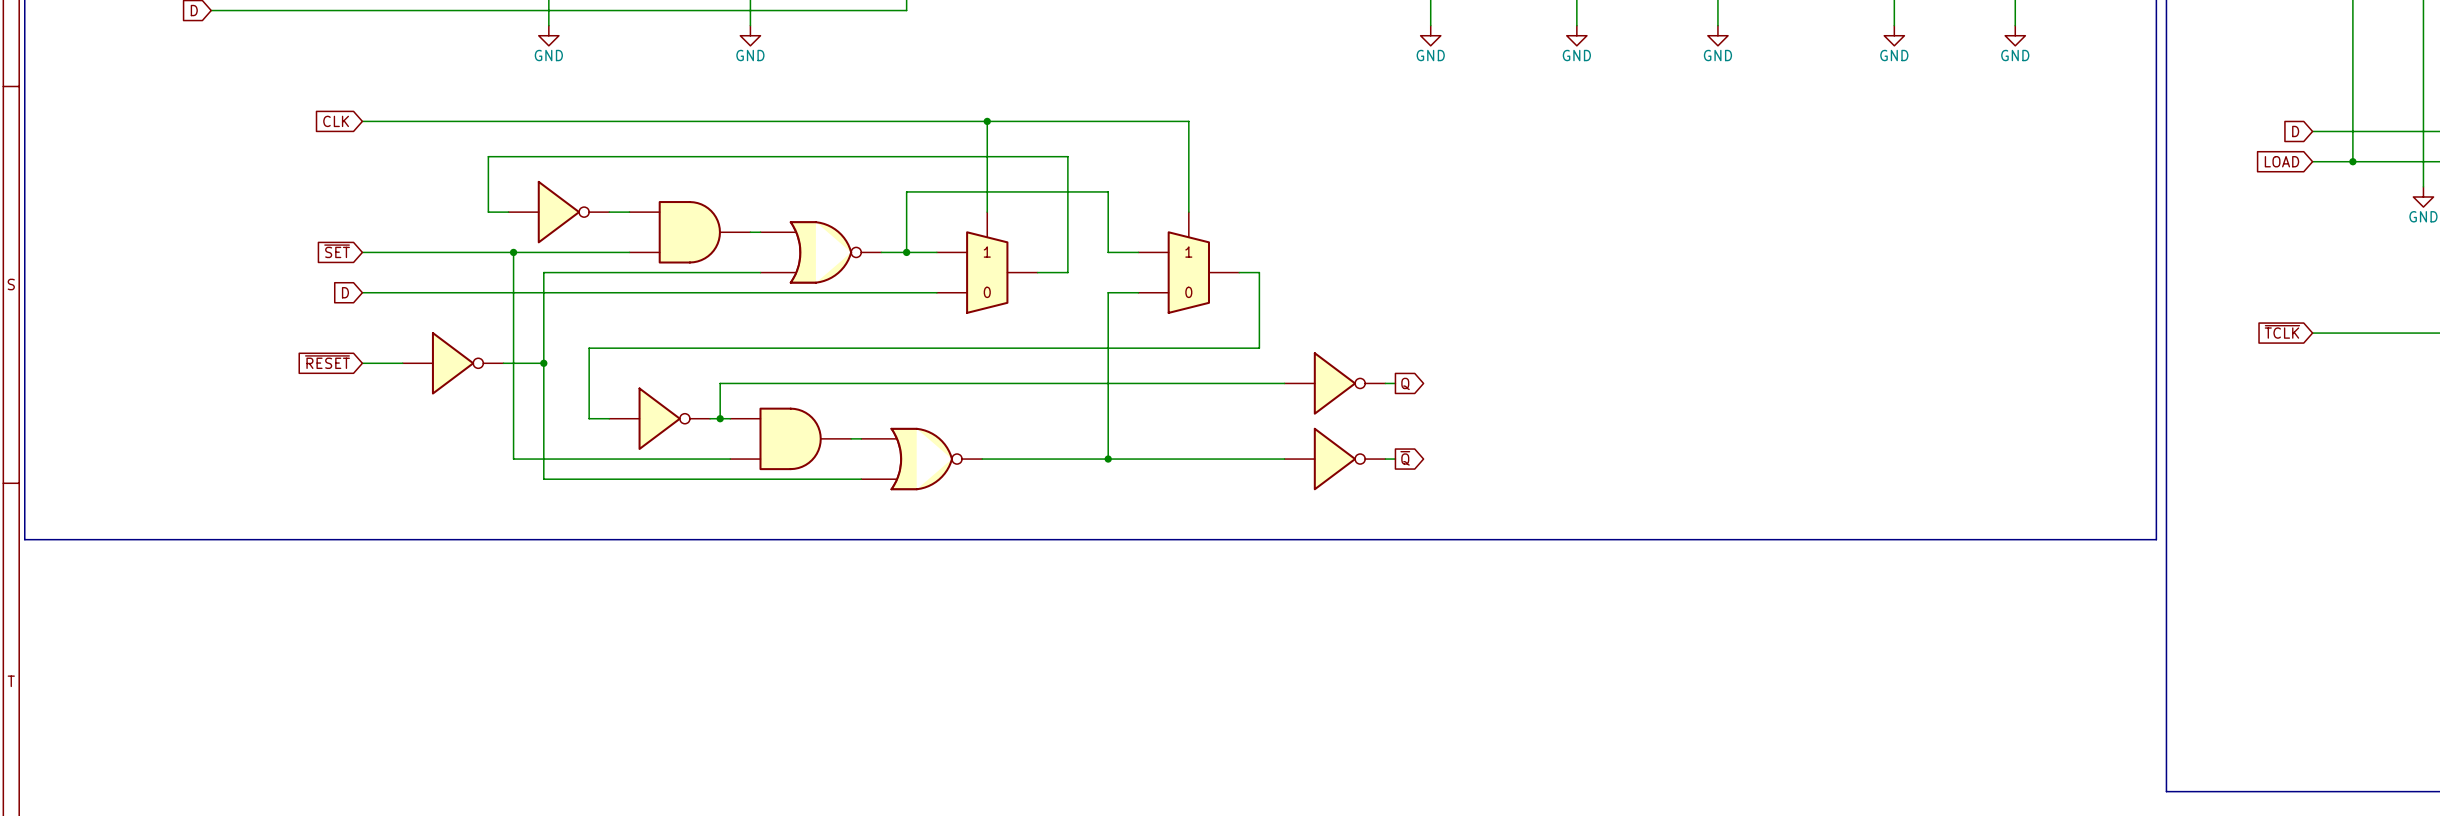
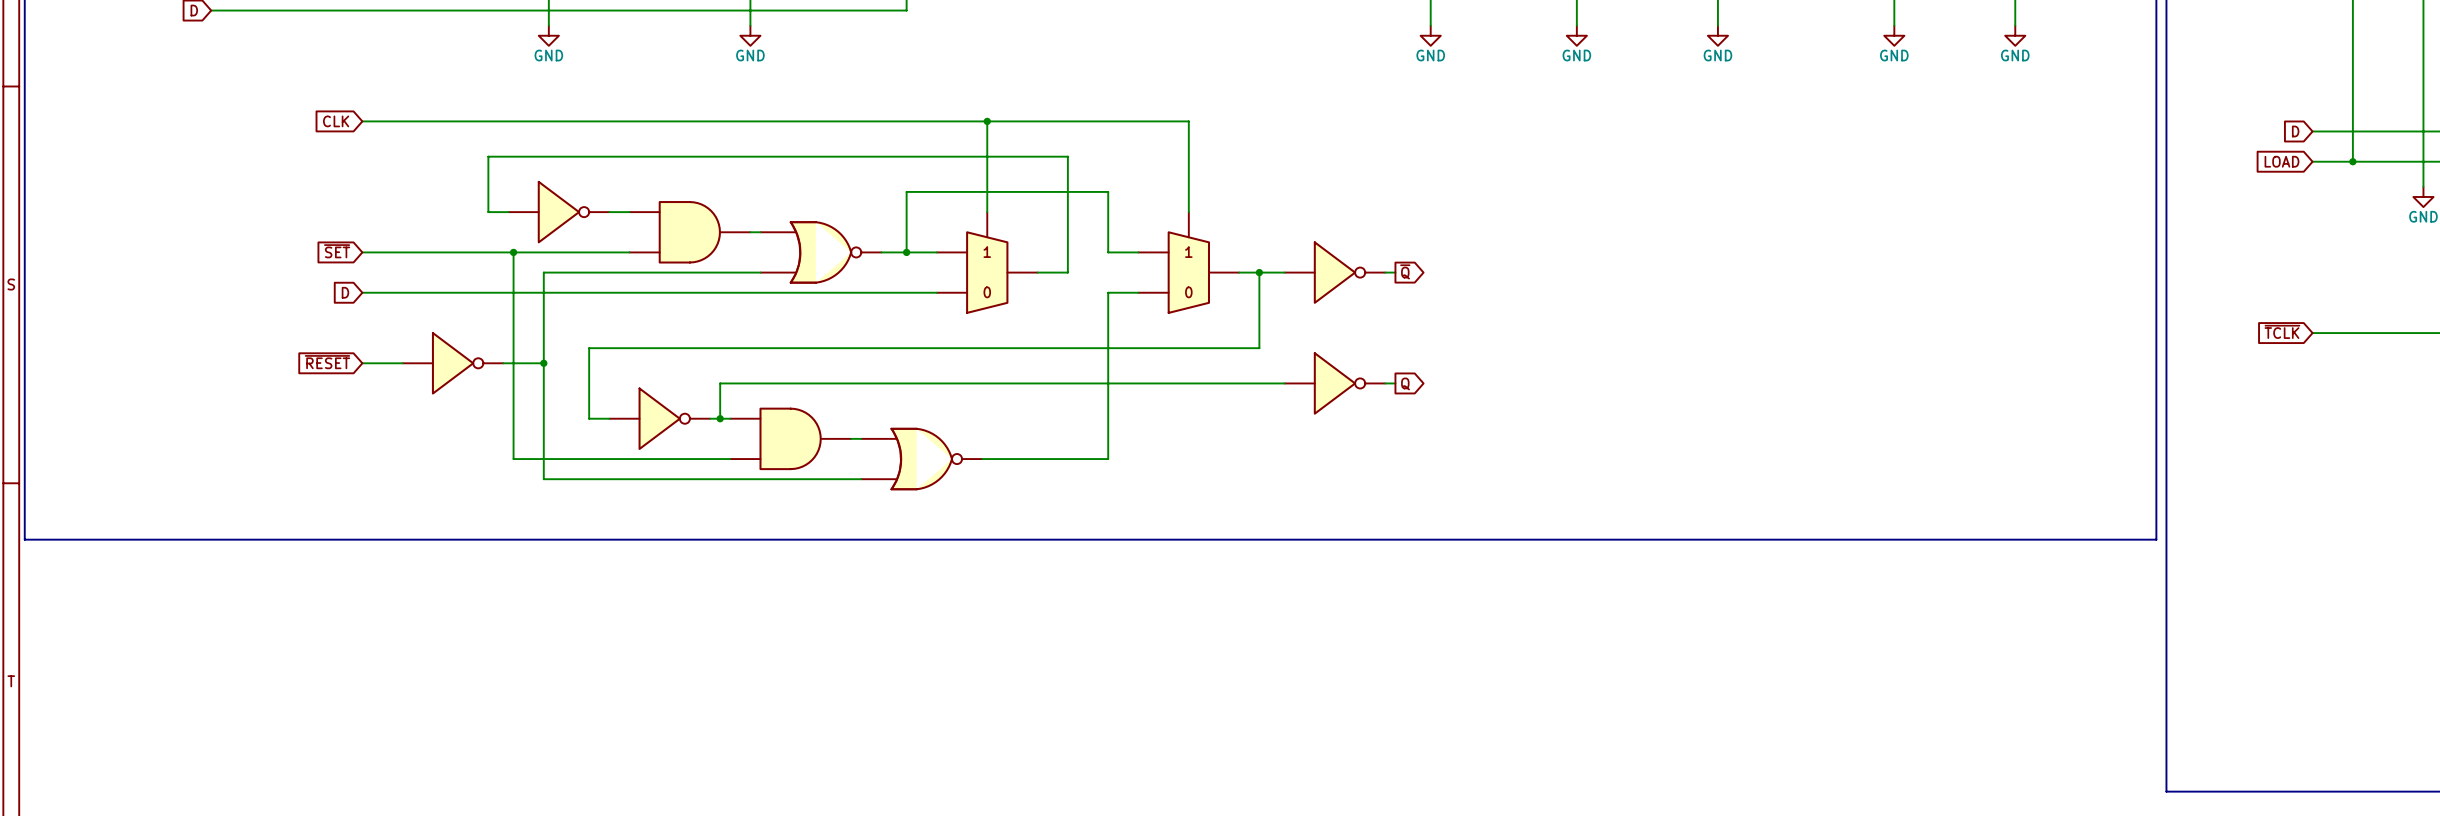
wire: none -> (1259, 272) (1284, 272)
junction: none -> (1259, 272)
global label position: ~{Q} (1405, 458) -> ~{Q} (1405, 271)
wire: (1108, 459) (1284, 459) -> none
junction: (1108, 459) -> none
part position: (1334, 459) -> (1334, 272)
wire: (1385, 459) (1395, 459) -> (1385, 272) (1395, 272)

